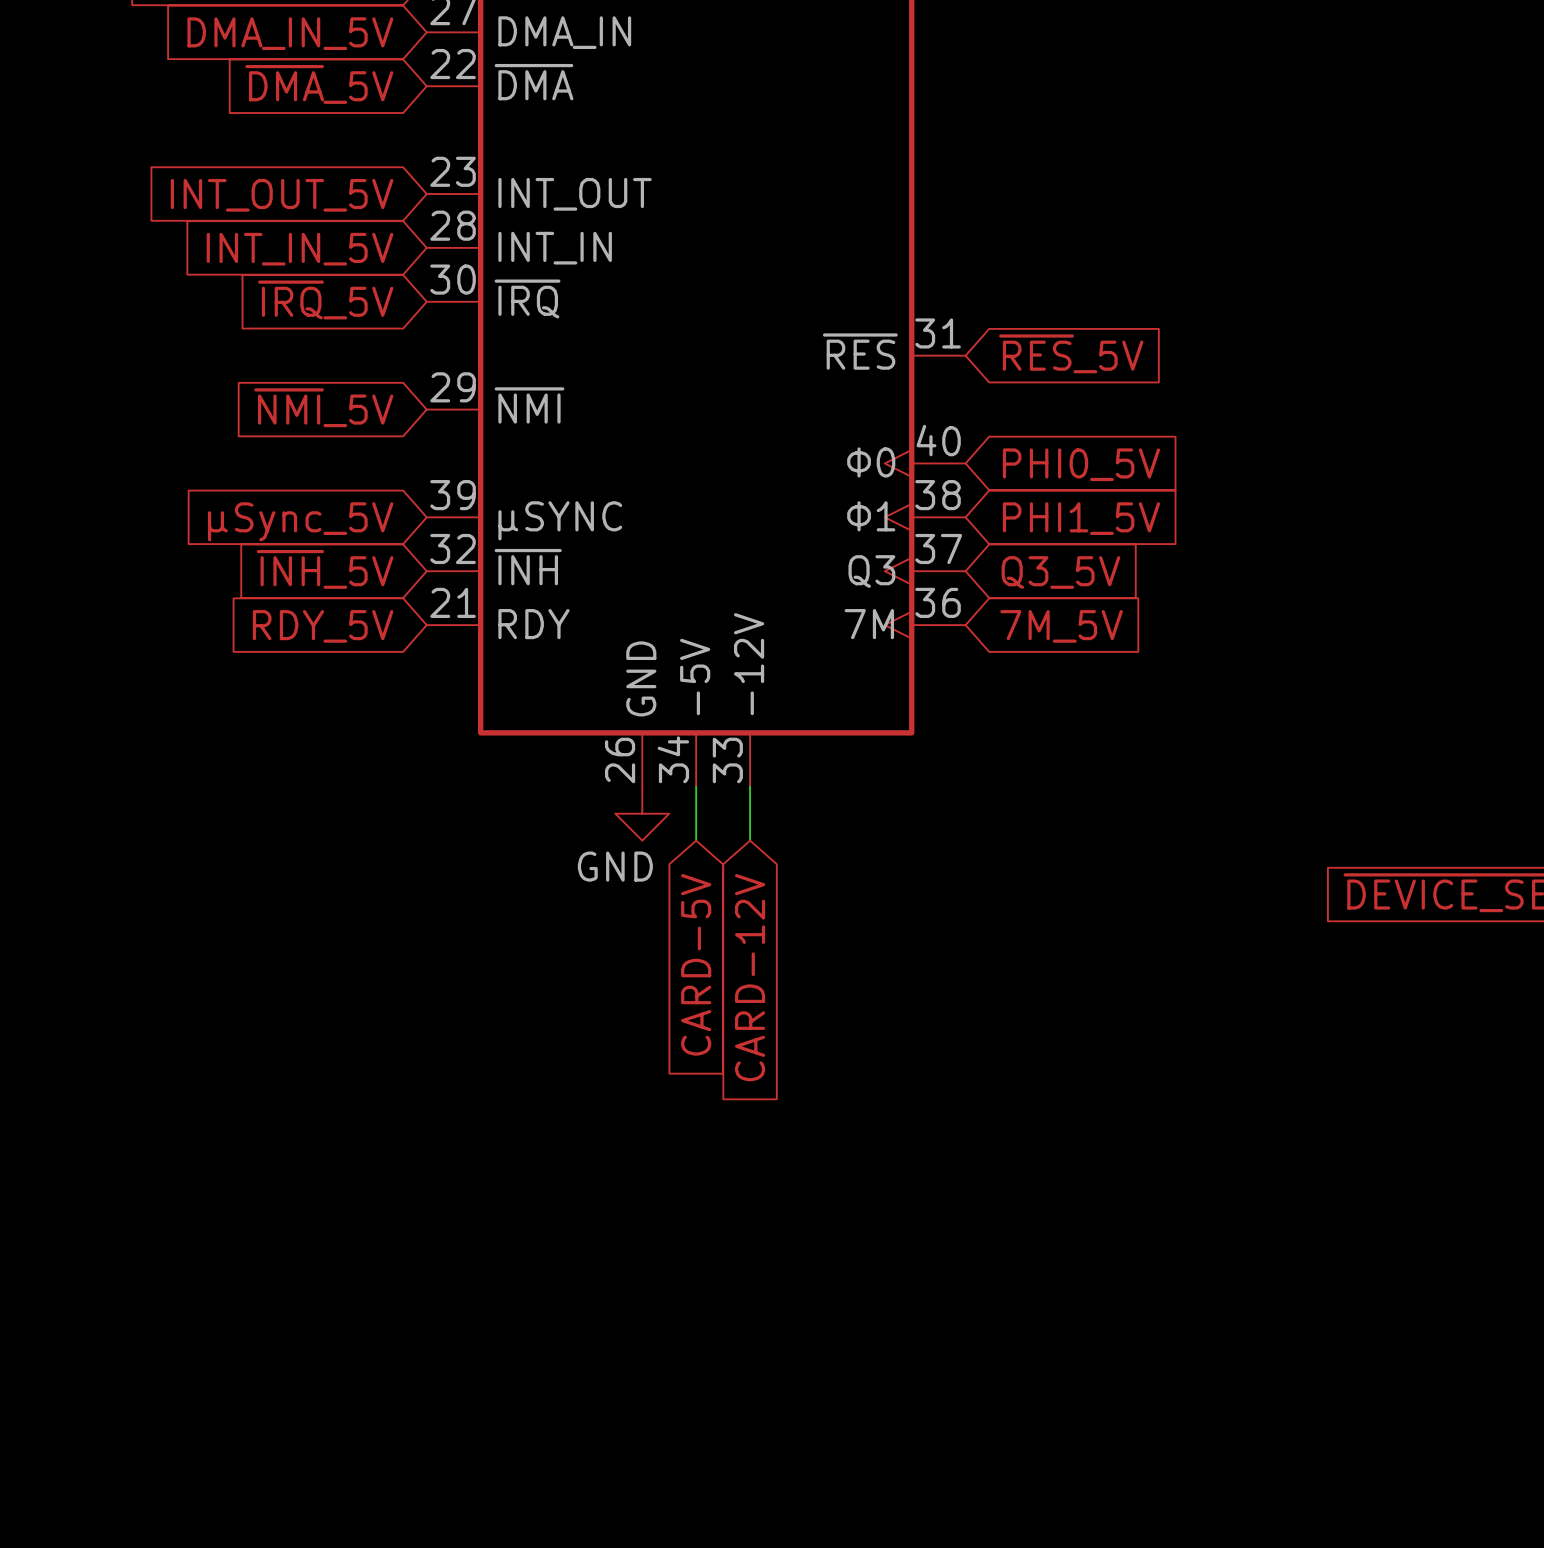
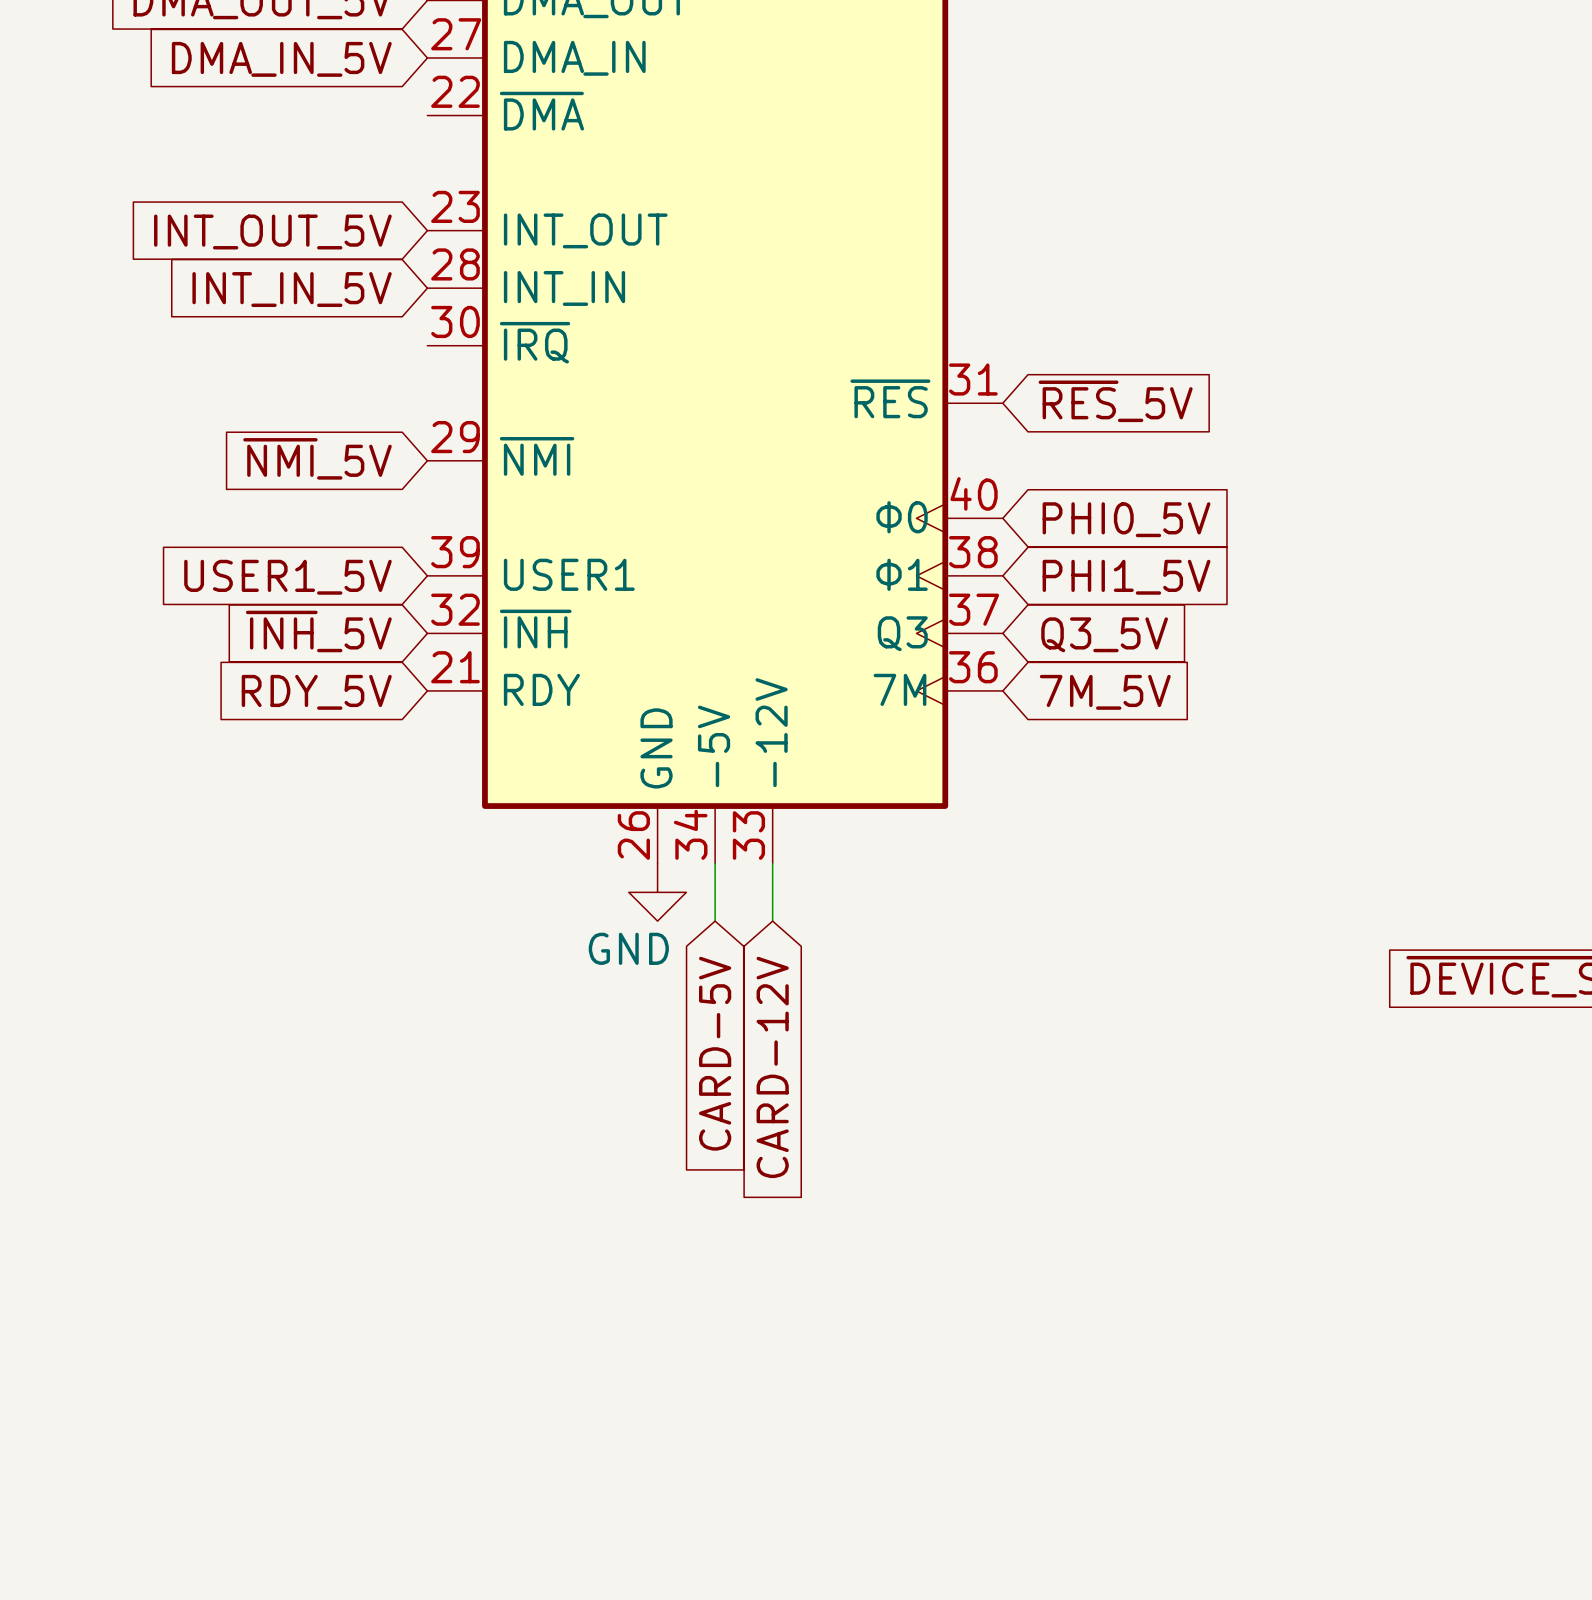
global label: ~{DMA}_5V (319, 84) -> none
global label: ~{IRQ}_5V (325, 299) -> none
part pin name: µSYNC (560, 520) -> USER1 (569, 574)
global label: µSync_5V (300, 521) -> USER1_5V (287, 577)

